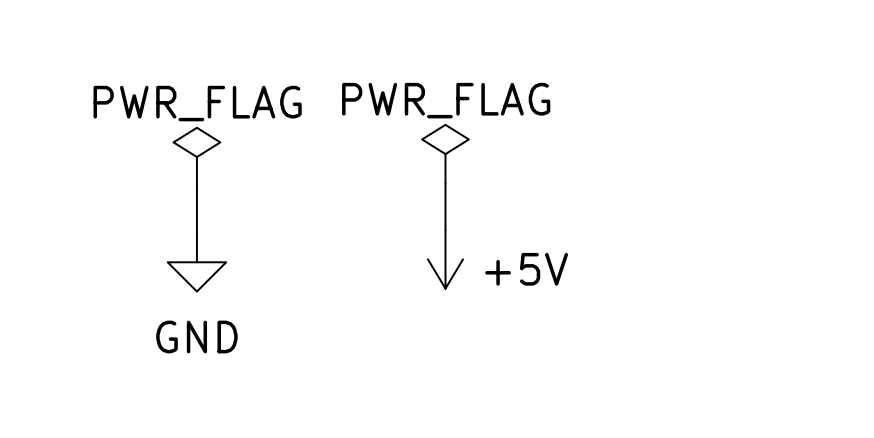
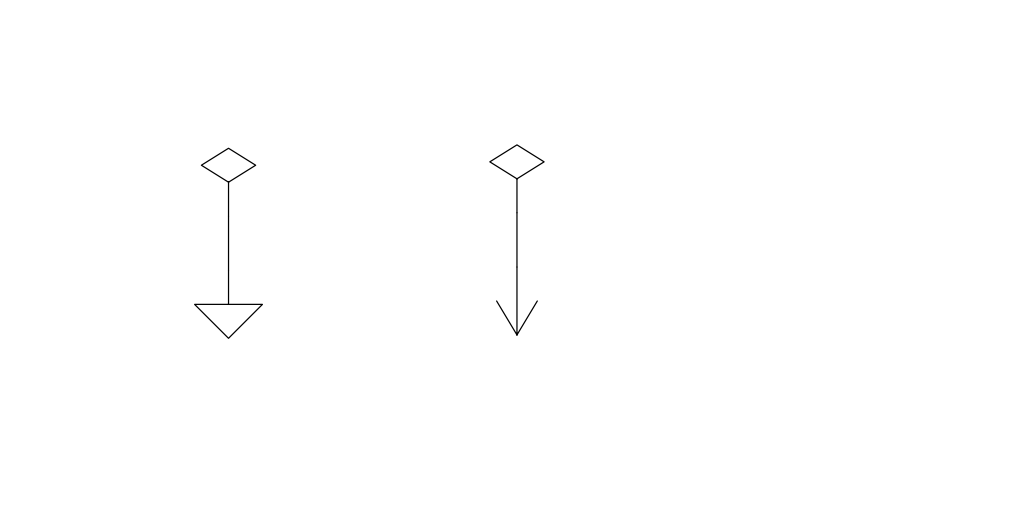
power symbol text: PWR_FLAG (446, 100) -> none
power symbol text: PWR_FLAG (197, 103) -> none
power symbol text: +5V (526, 269) -> none
power symbol text: GND (196, 337) -> none

